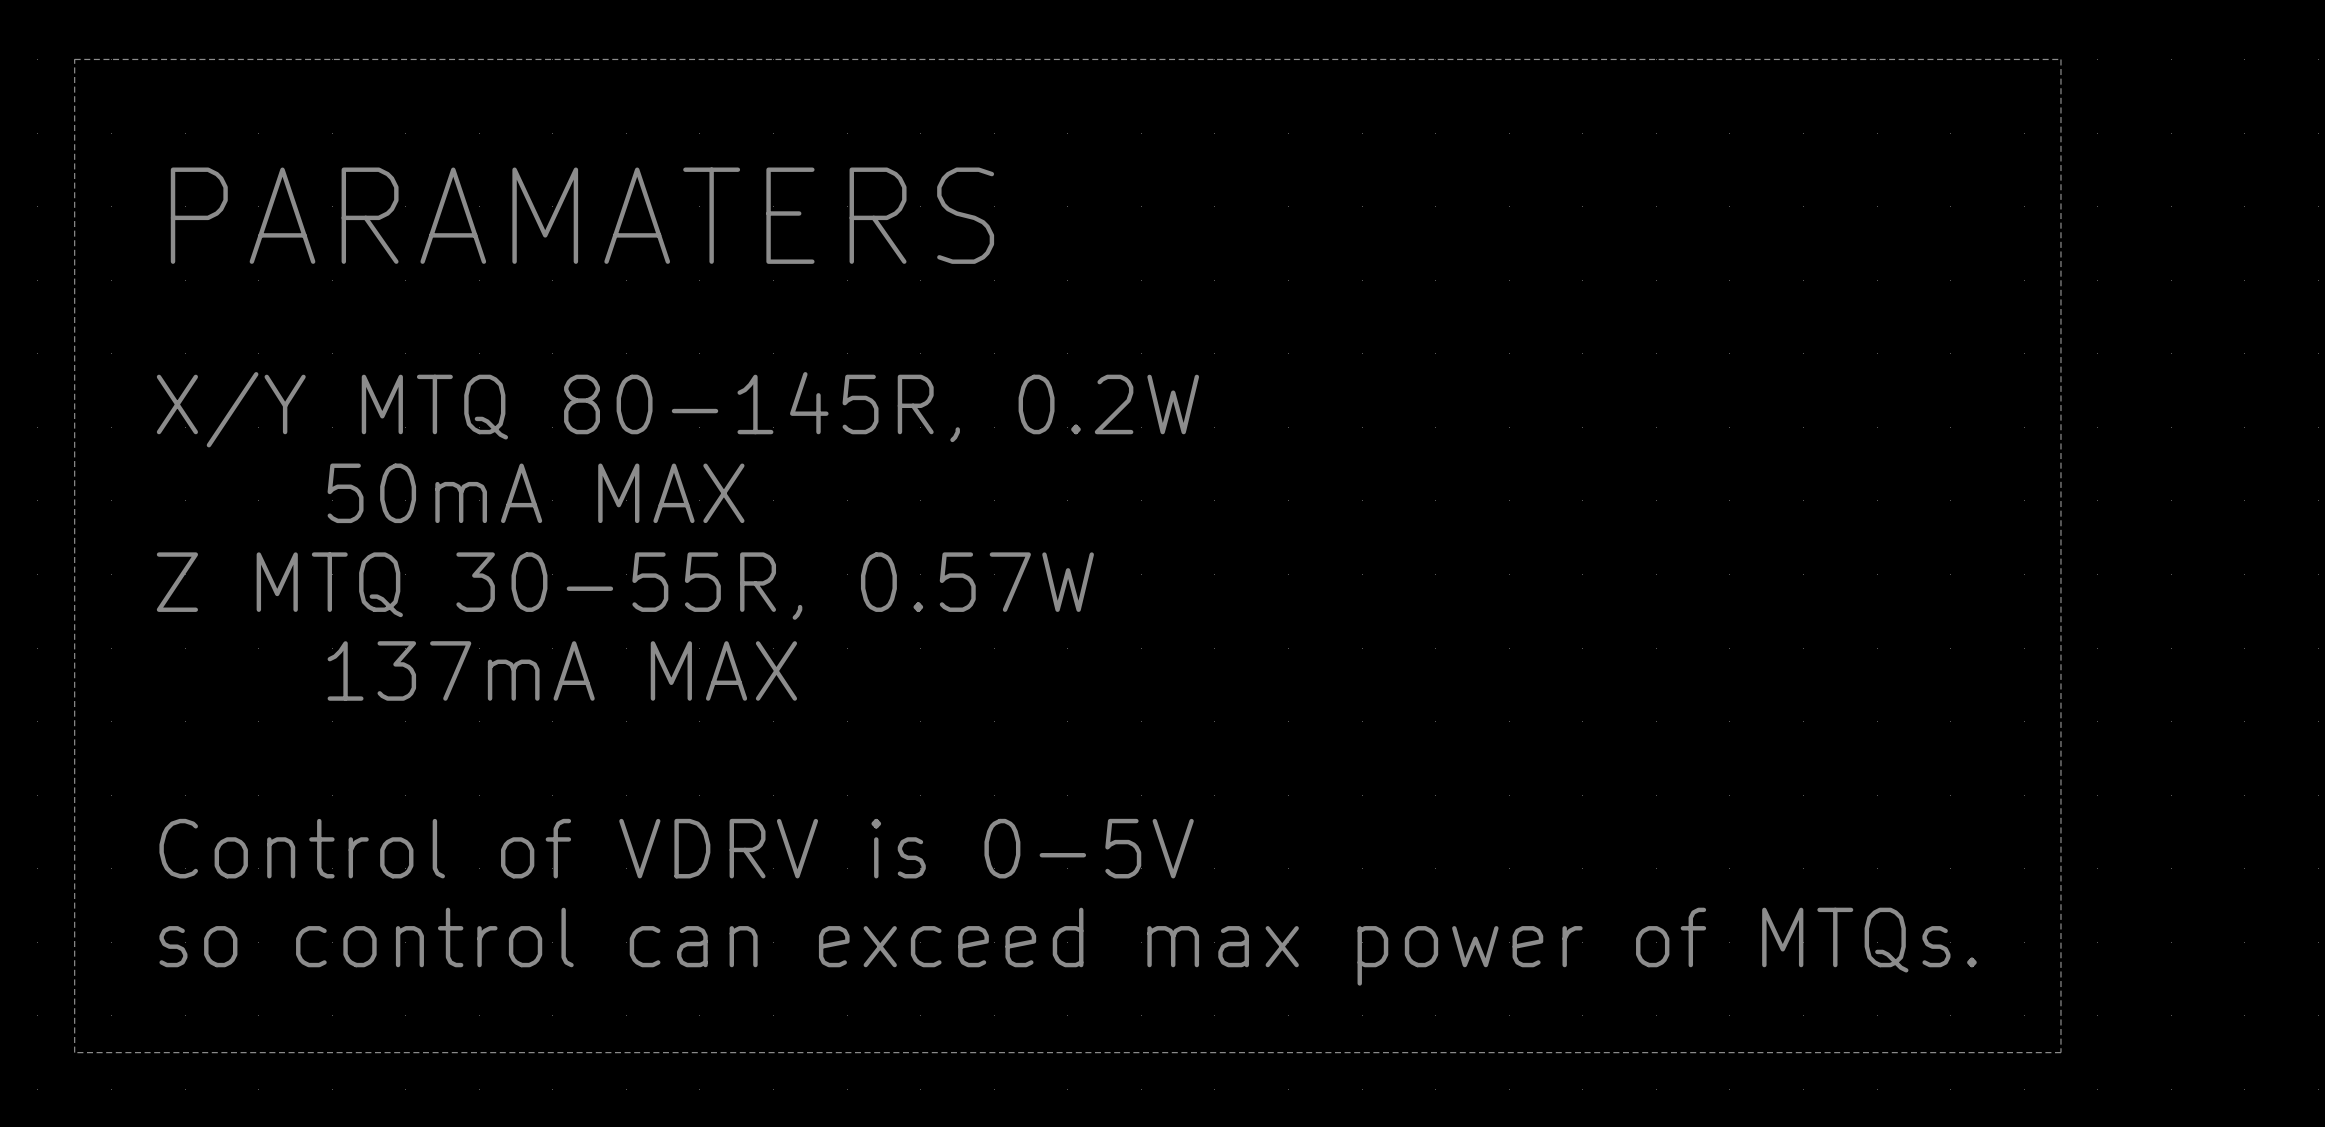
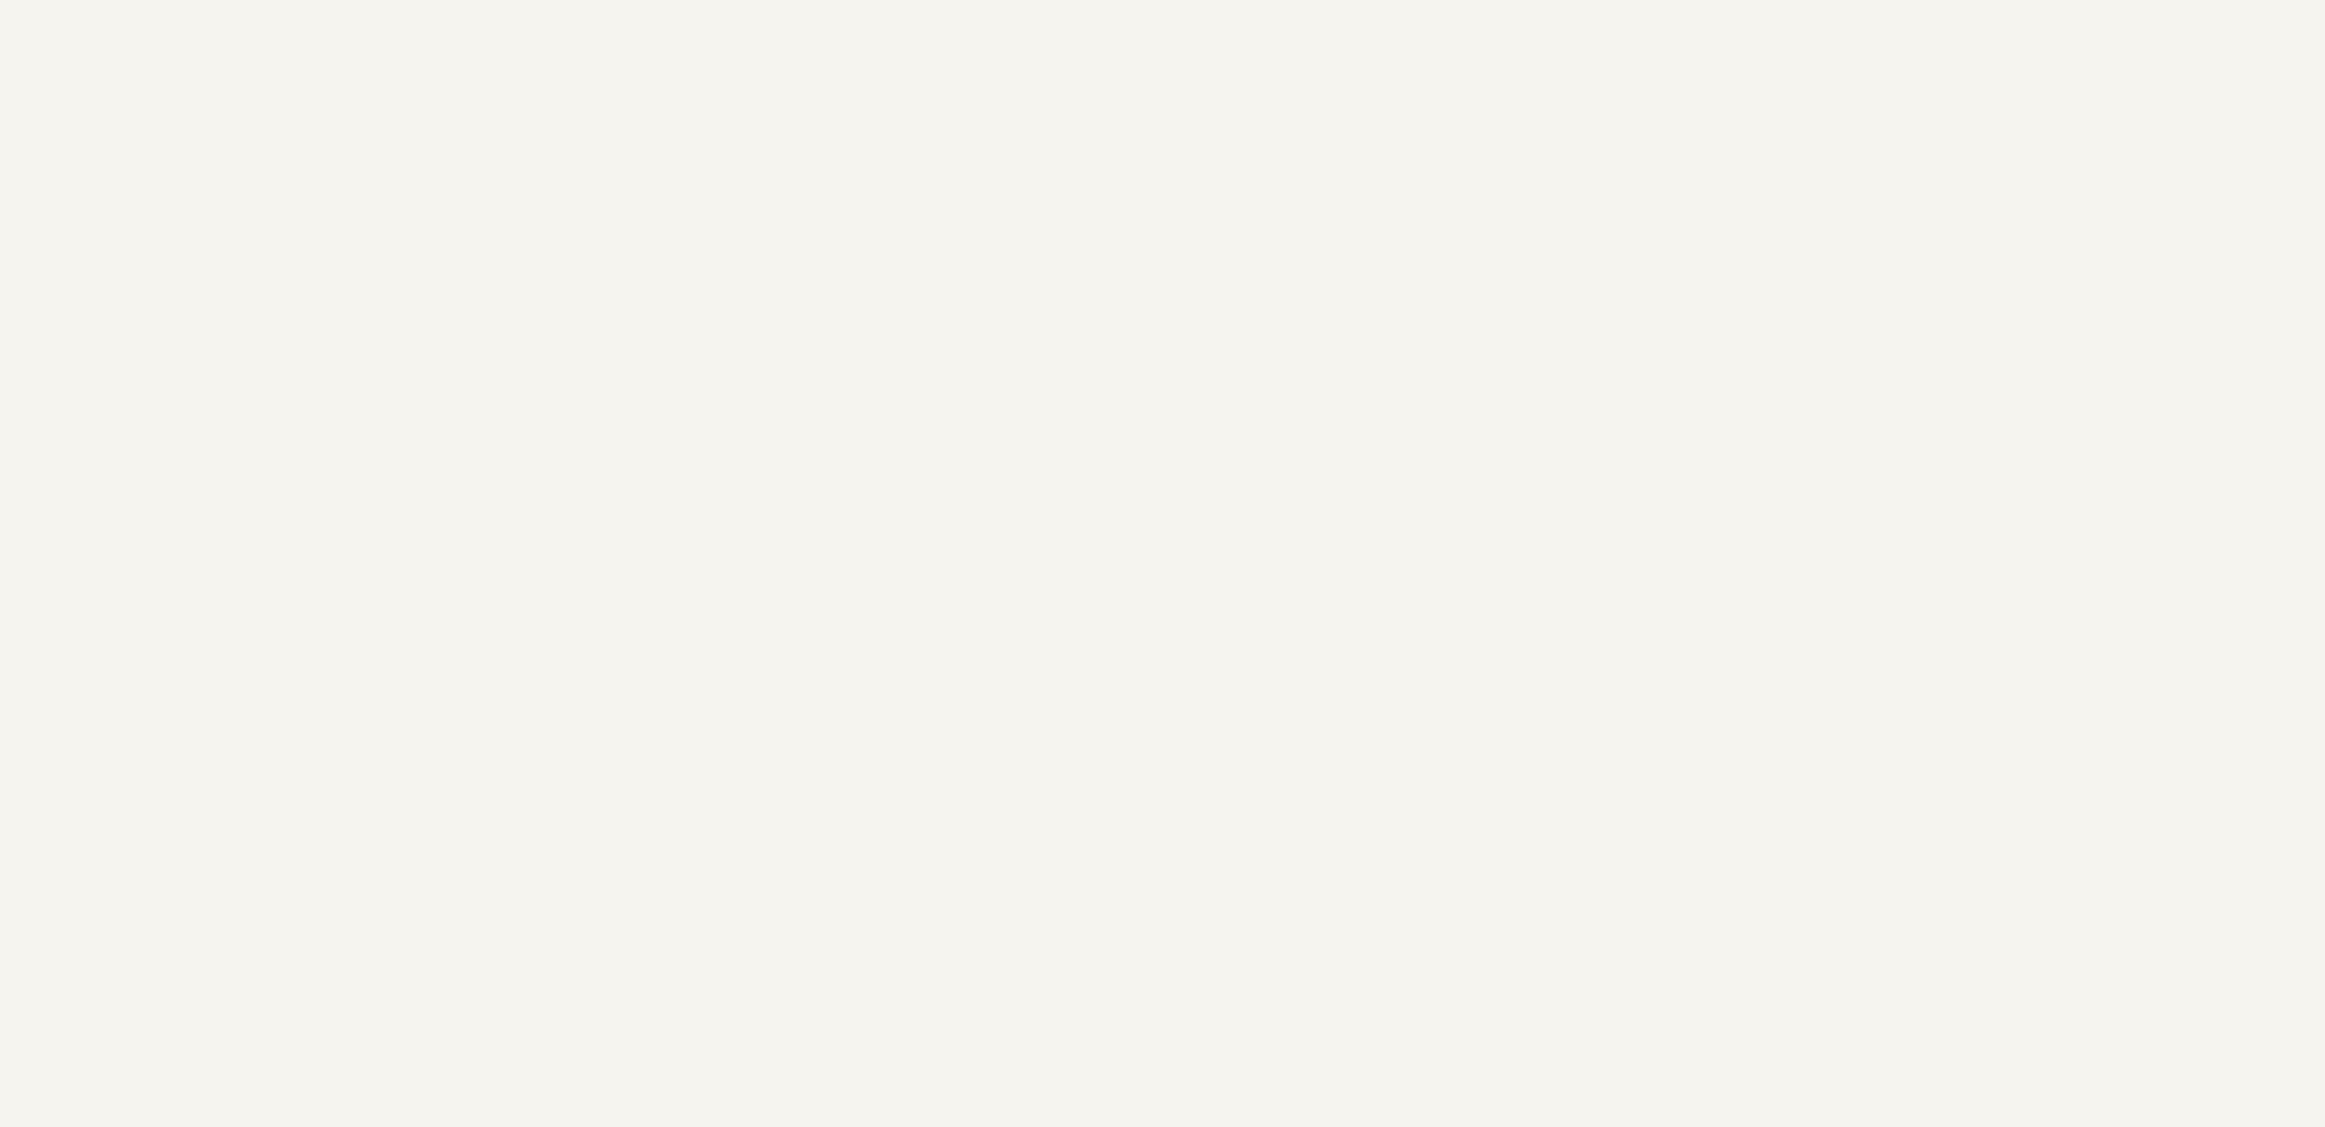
line: (74, 59) (2060, 59) (2060, 1052) (74, 1052) (74, 59) -> none
text: PARAMATERS (582, 215) -> none
text: X/Y MTQ 80-145R, 0.2W (677, 409) -> none
text: 50mA MAX (536, 493) -> none
text: Z MTQ 30-55R, 0.57W (625, 586) -> none
text: 137mA MAX (562, 670) -> none
text: Control of VDRV is 0-5V (676, 848) -> none
text: so control can exceed max power of MTQs. (1068, 946) -> none

